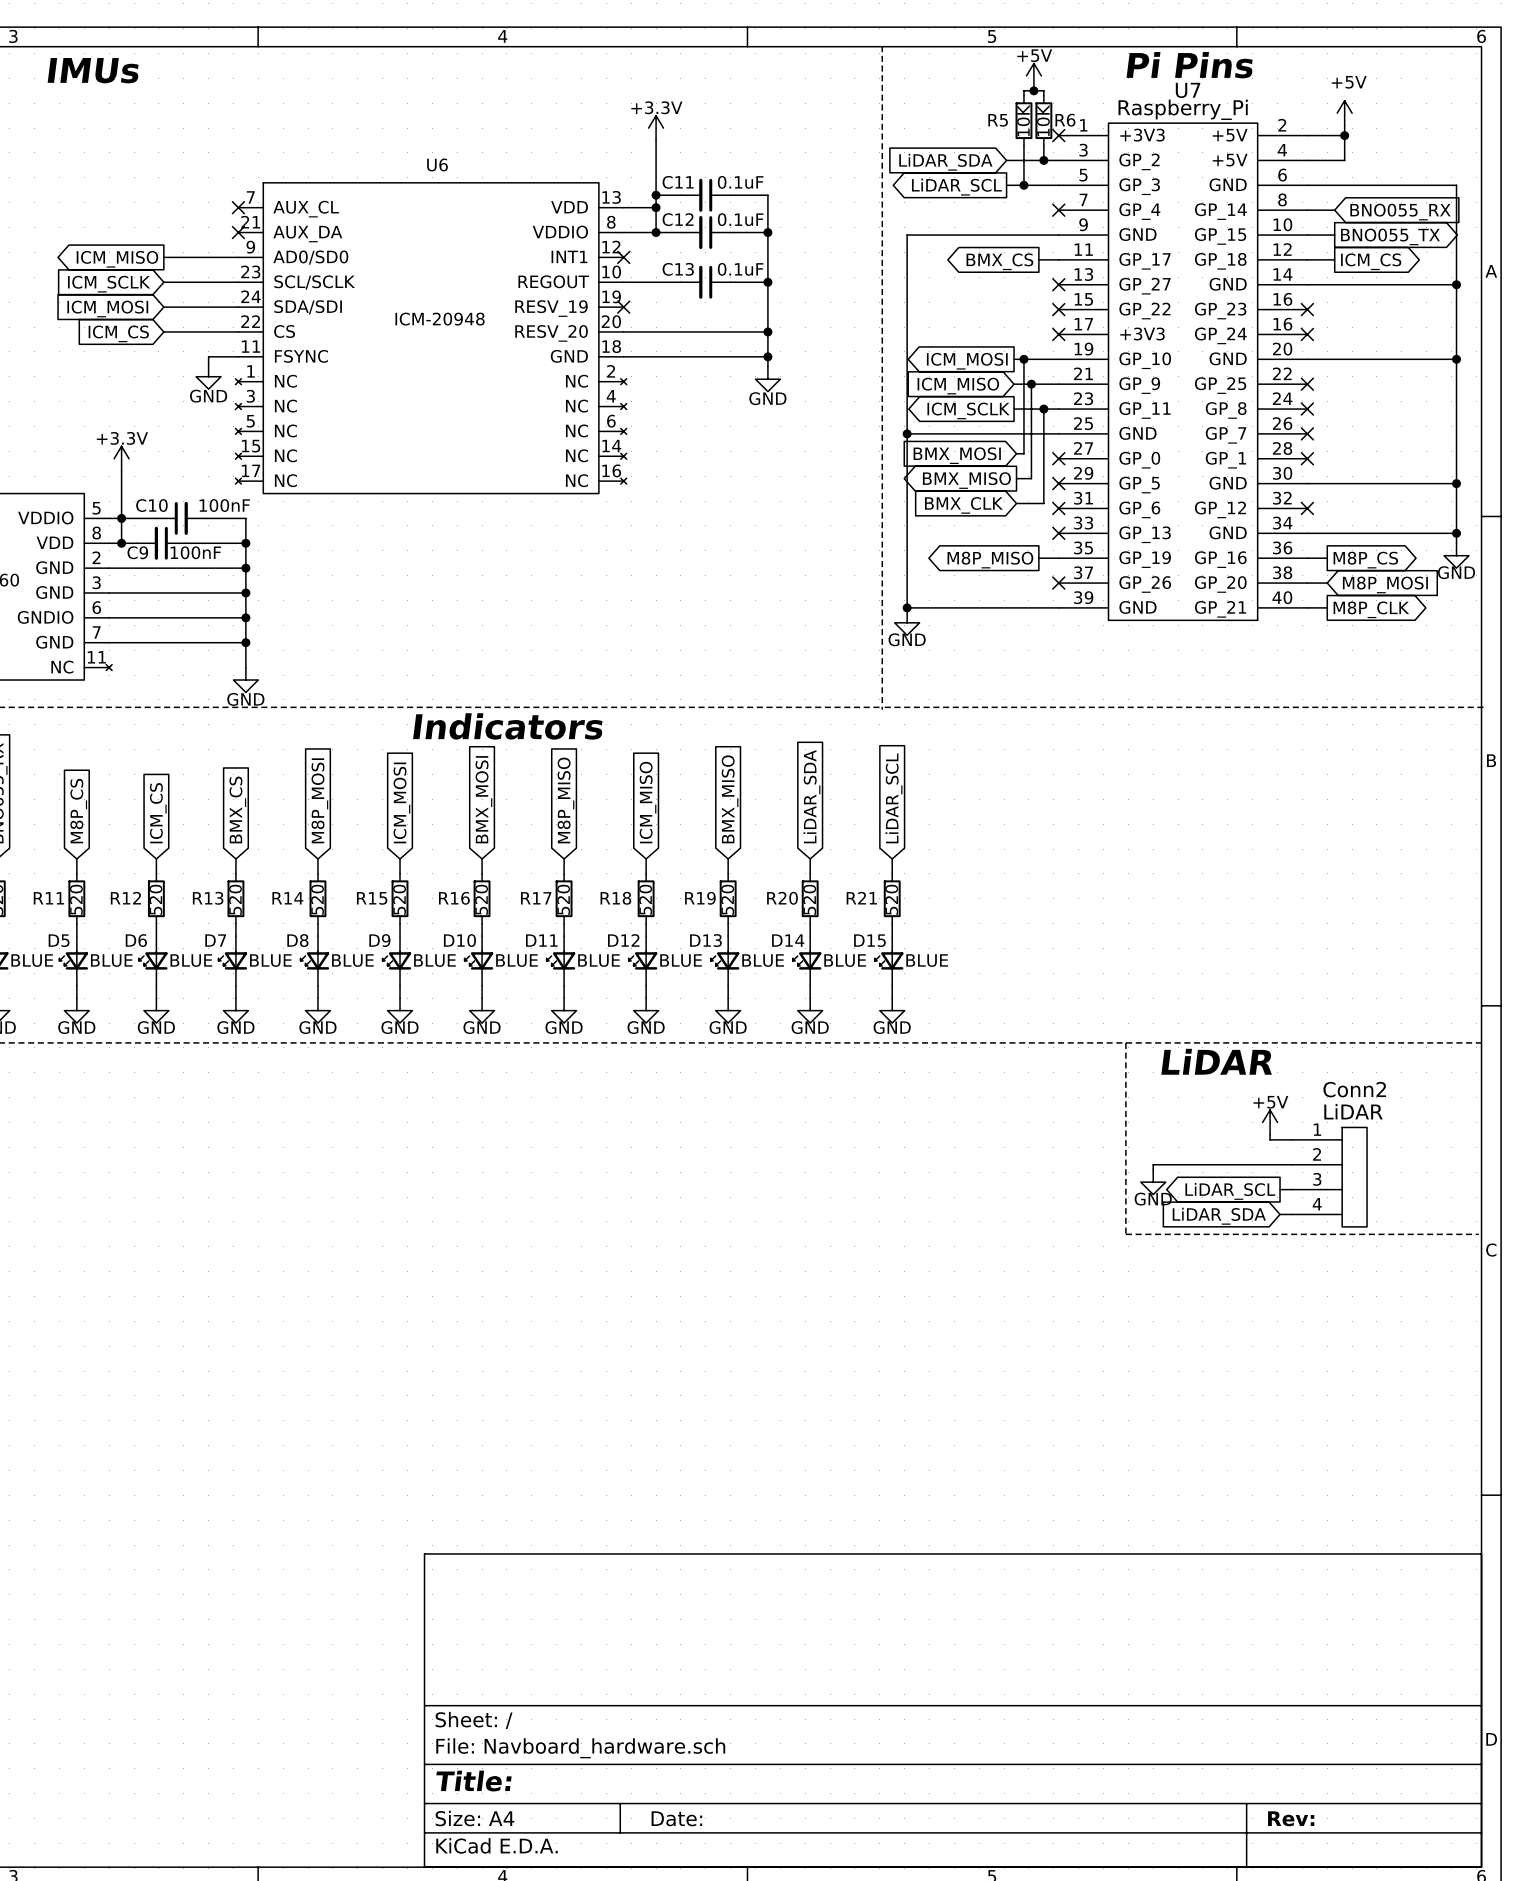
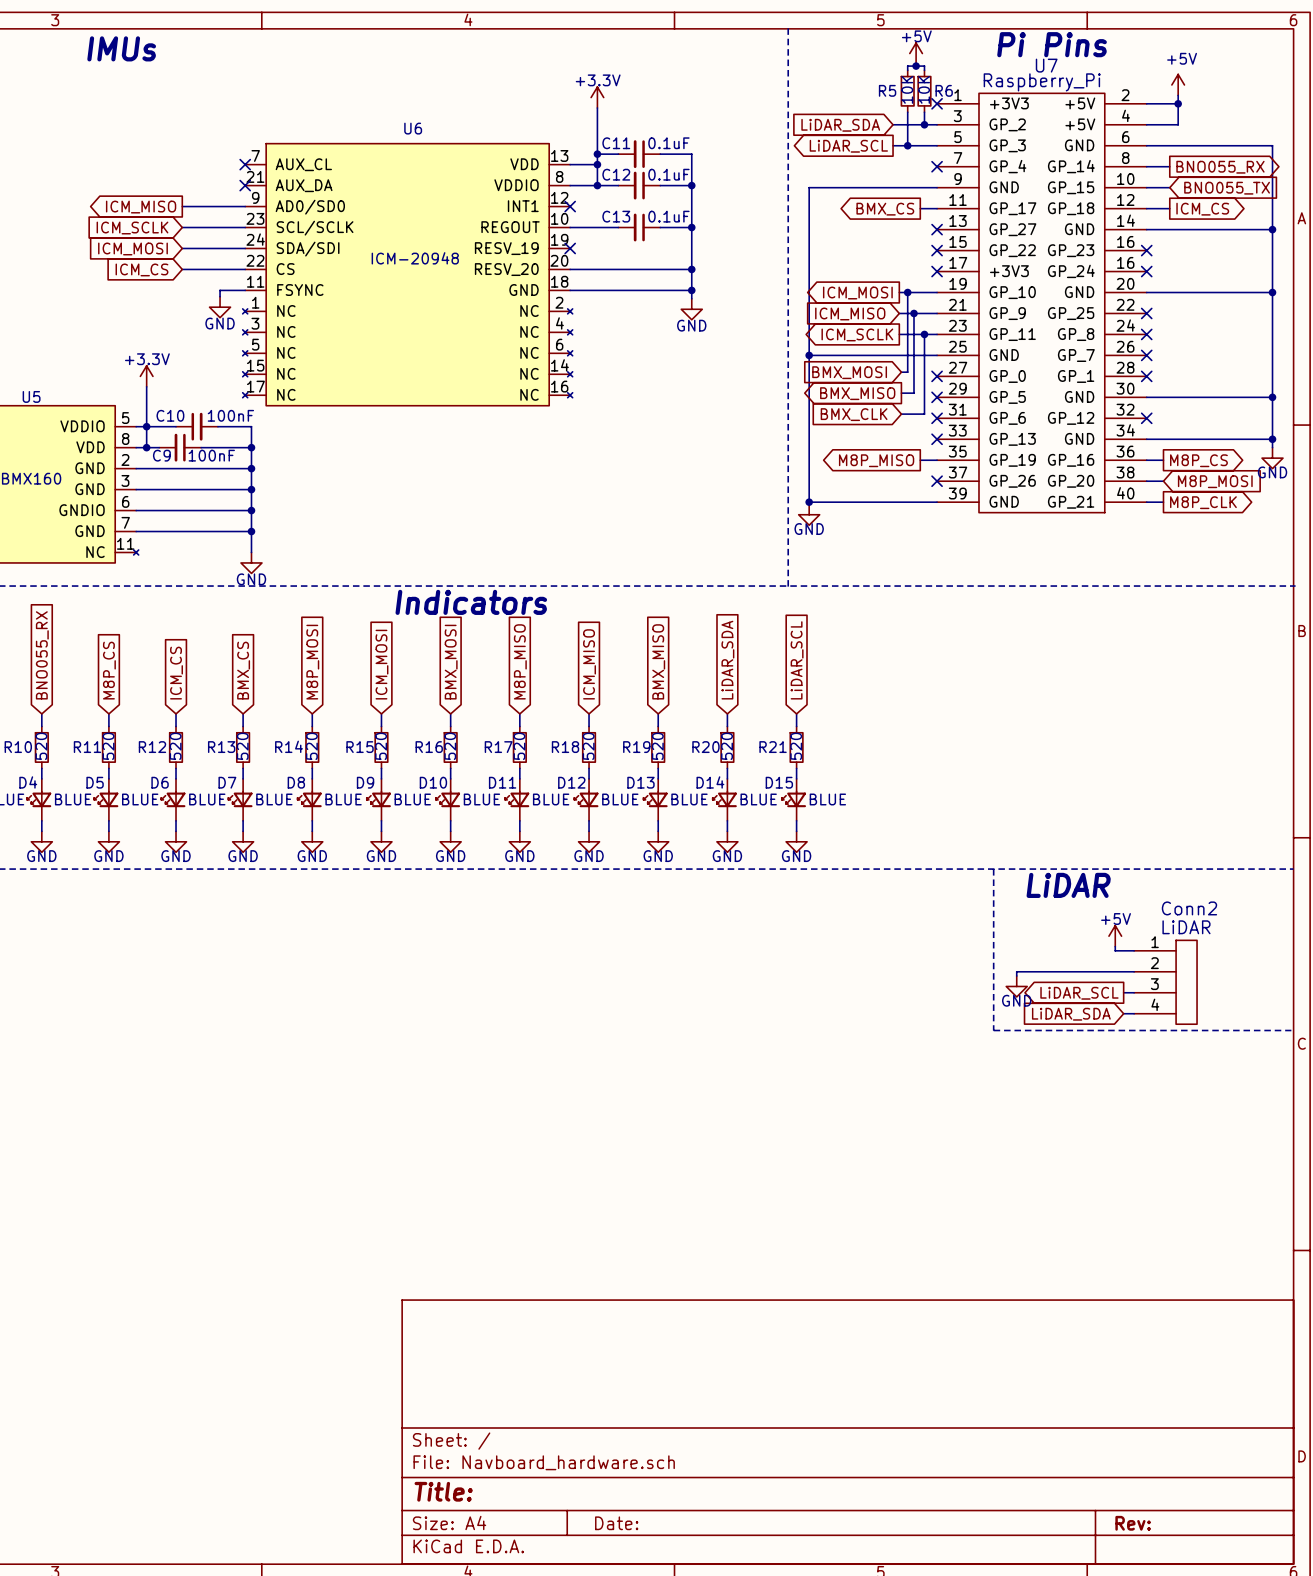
global label shape: input (1400, 212) -> output (1220, 167)
global label shape: output (1390, 236) -> input (1227, 188)

